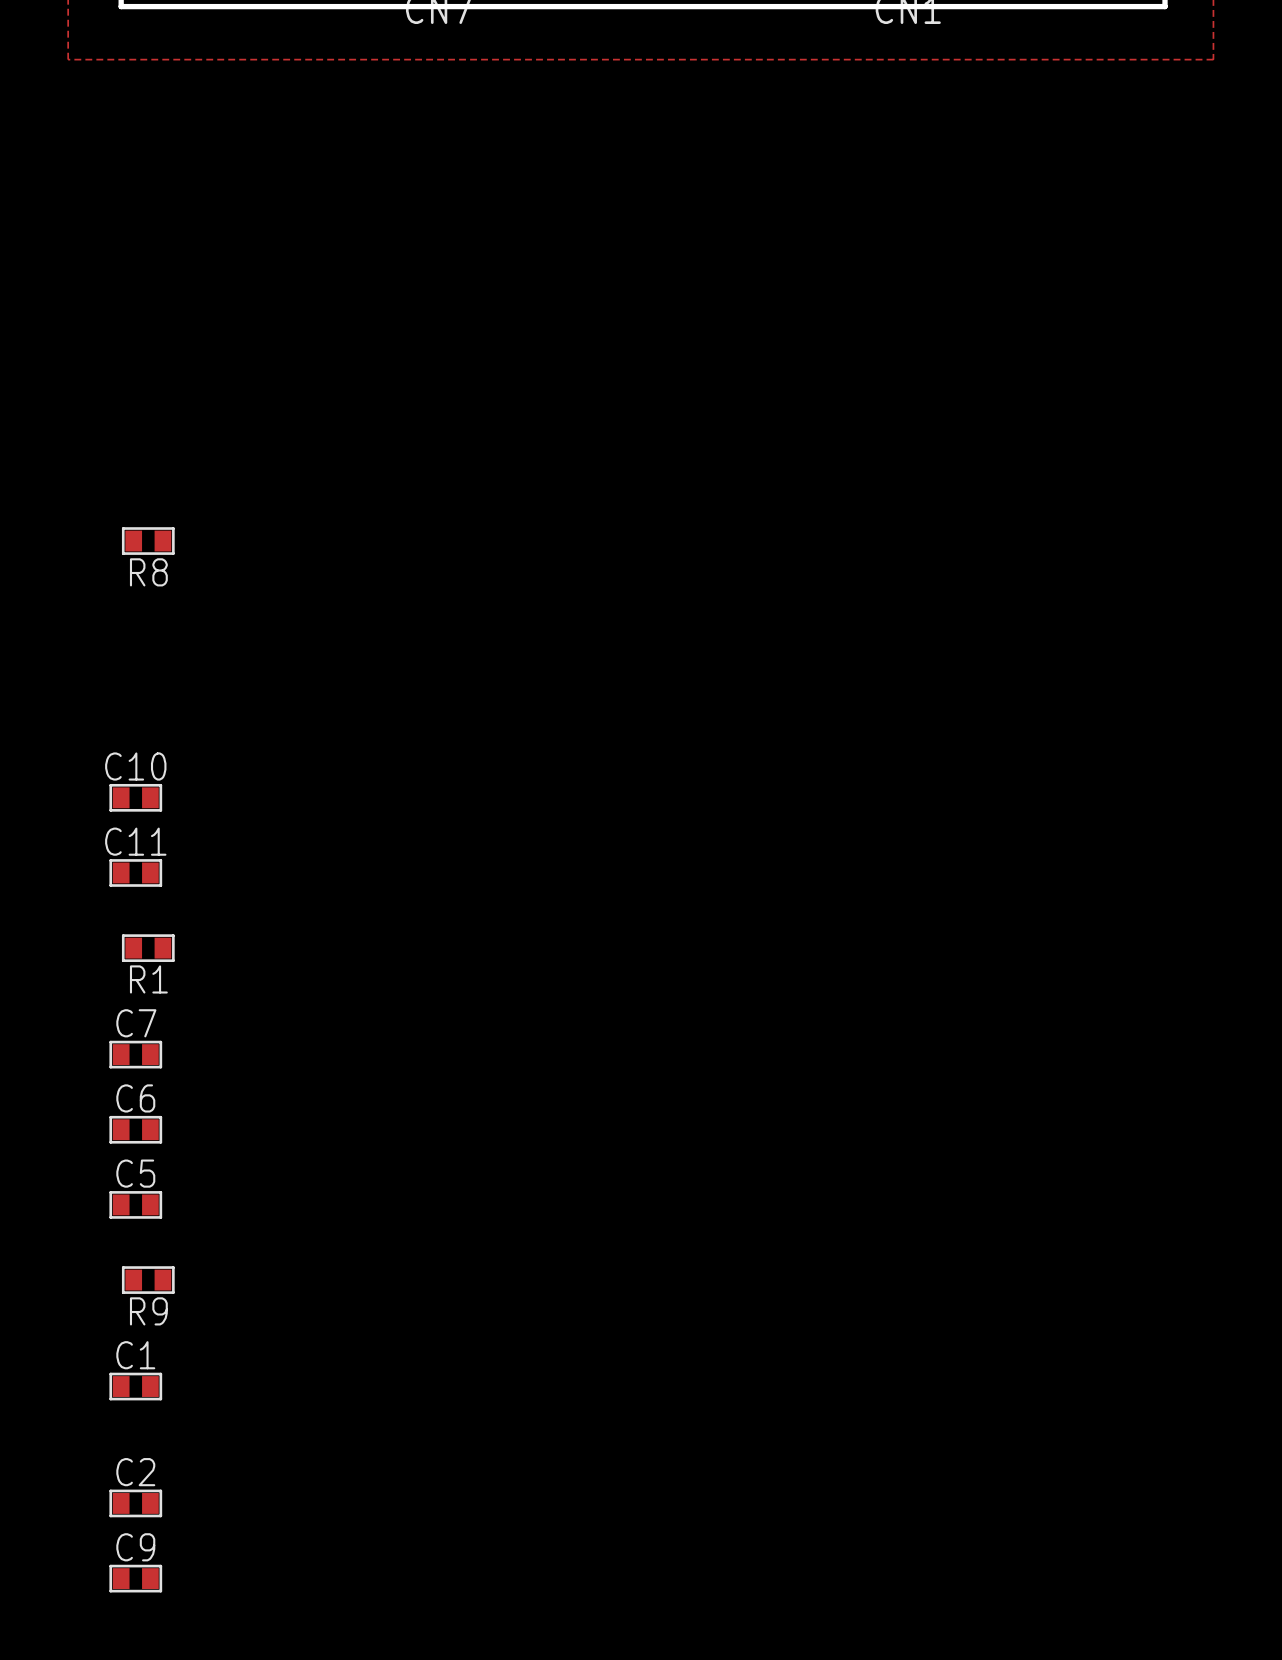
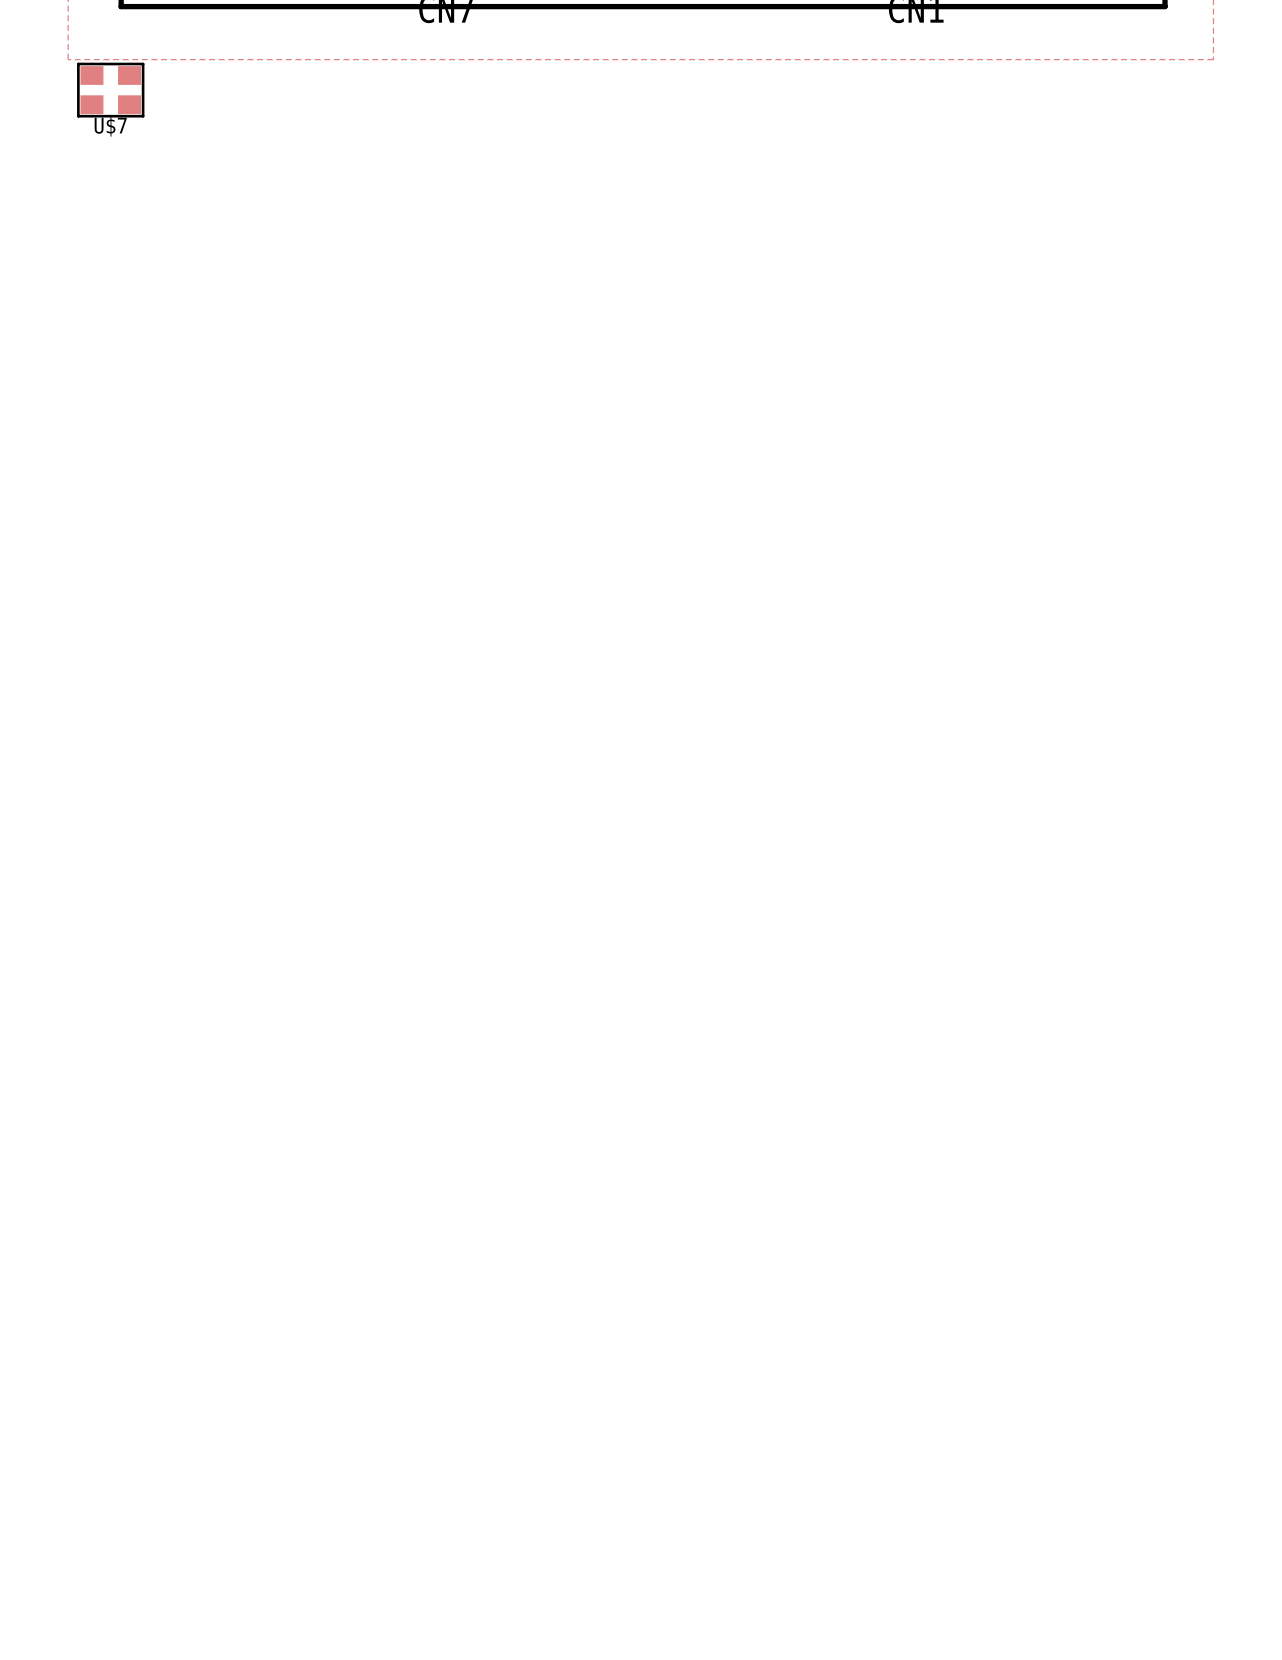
U$7: none -> (110, 90)
R8: (148, 541) -> none
C10: (135, 797) -> none
C11: (135, 872) -> none
R1: (148, 948) -> none
C7: (135, 1054) -> none
C6: (135, 1129) -> none
C5: (135, 1204) -> none
R9: (148, 1280) -> none
C1: (135, 1386) -> none
C2: (135, 1503) -> none
C9: (135, 1578) -> none

